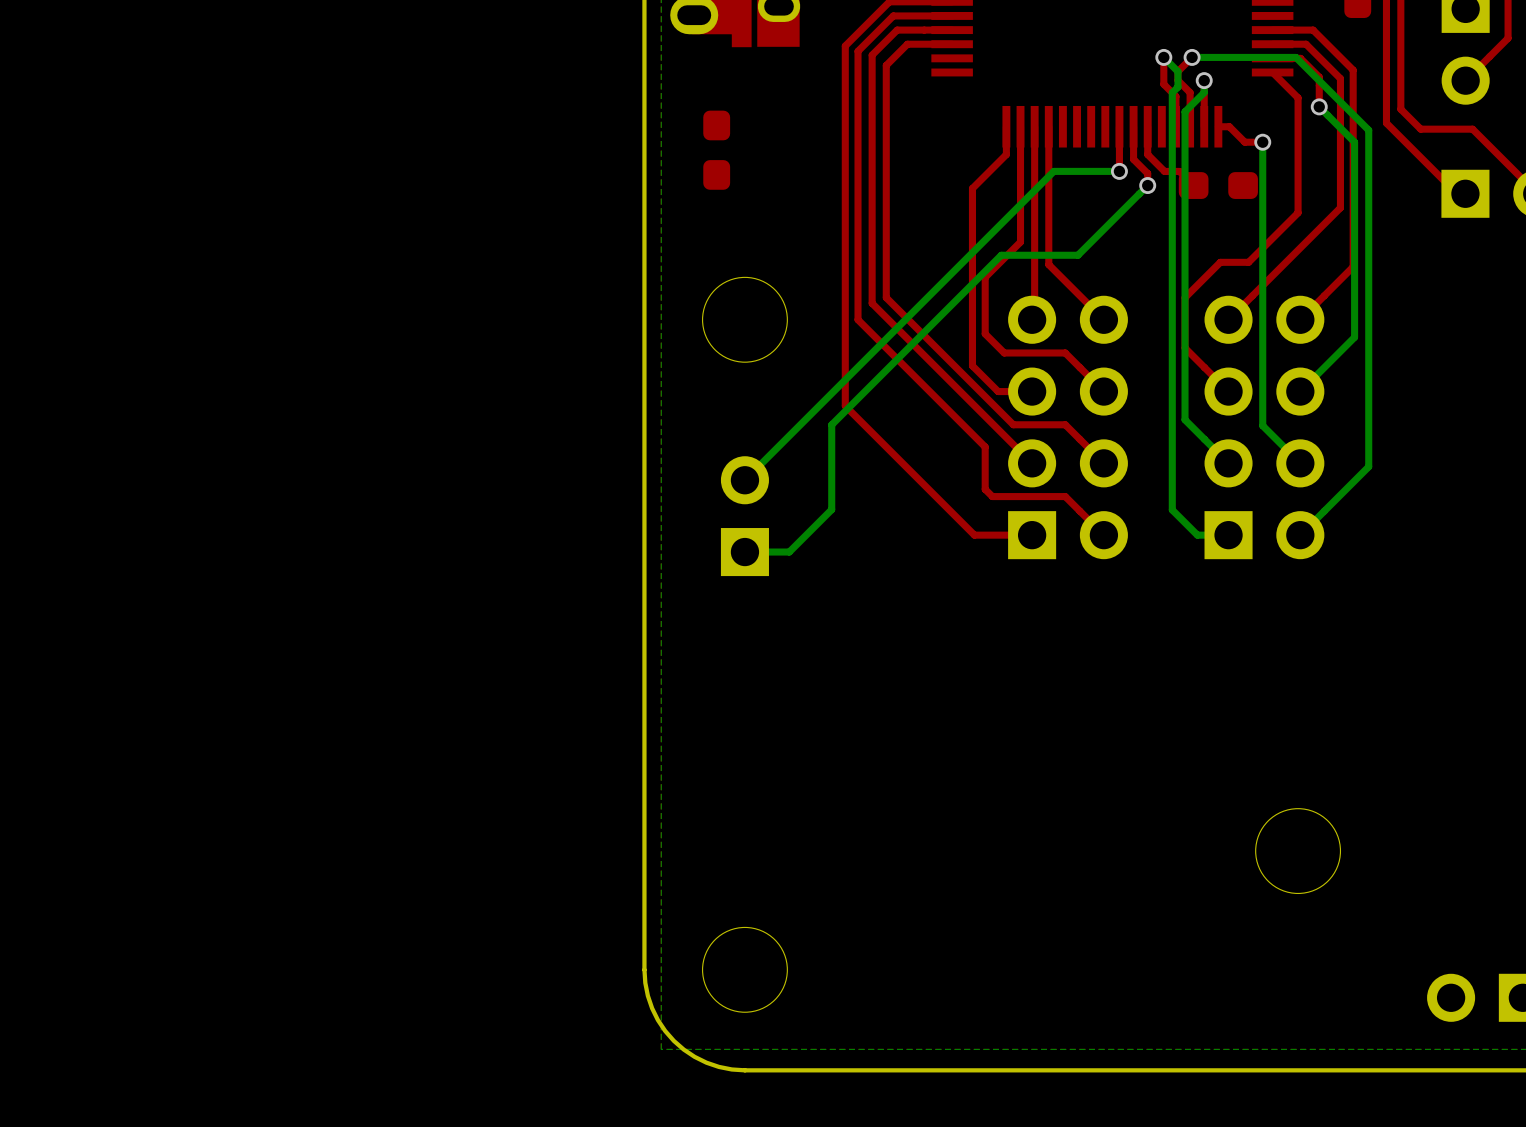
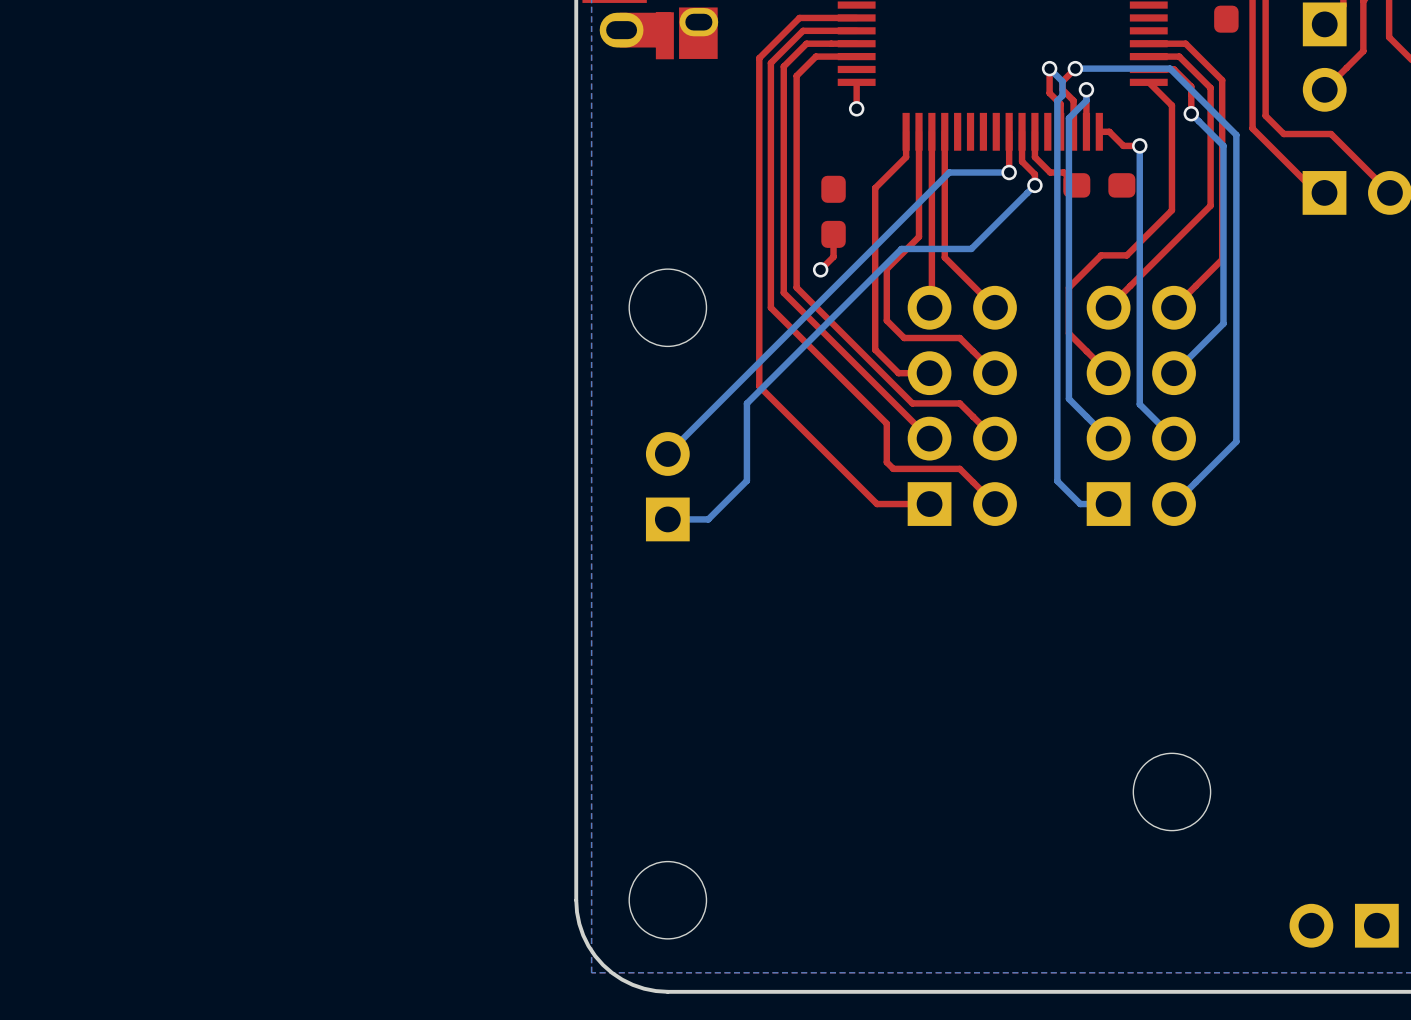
top track: none -> (856, 82) (856, 111)
via: none -> (856, 108)
part position: (716, 150) -> (833, 211)
top track: none -> (833, 234) (833, 256) (820, 269)
via: none -> (820, 269)

